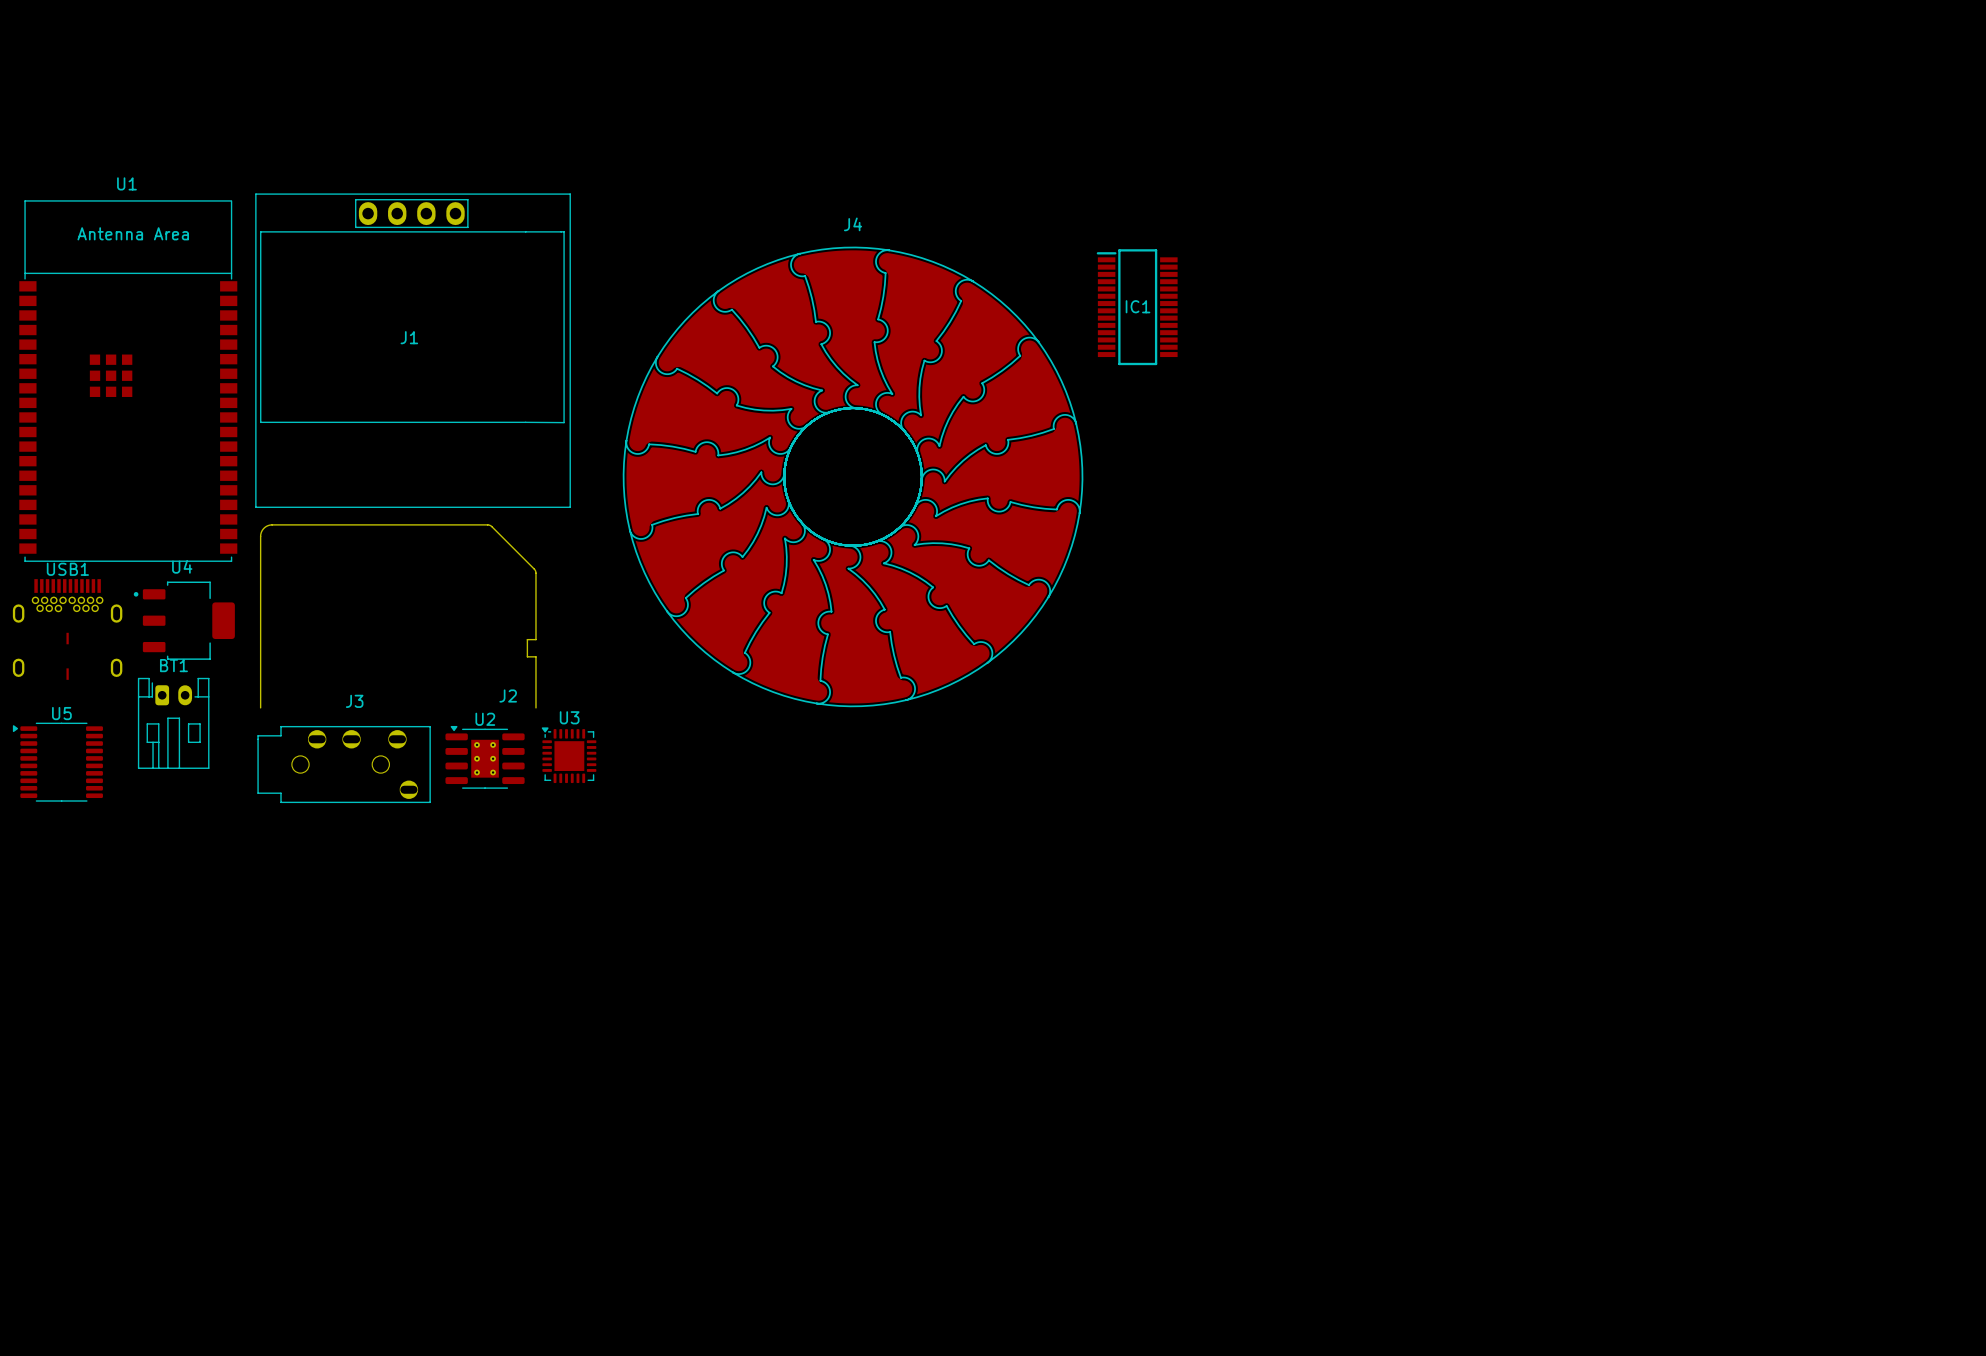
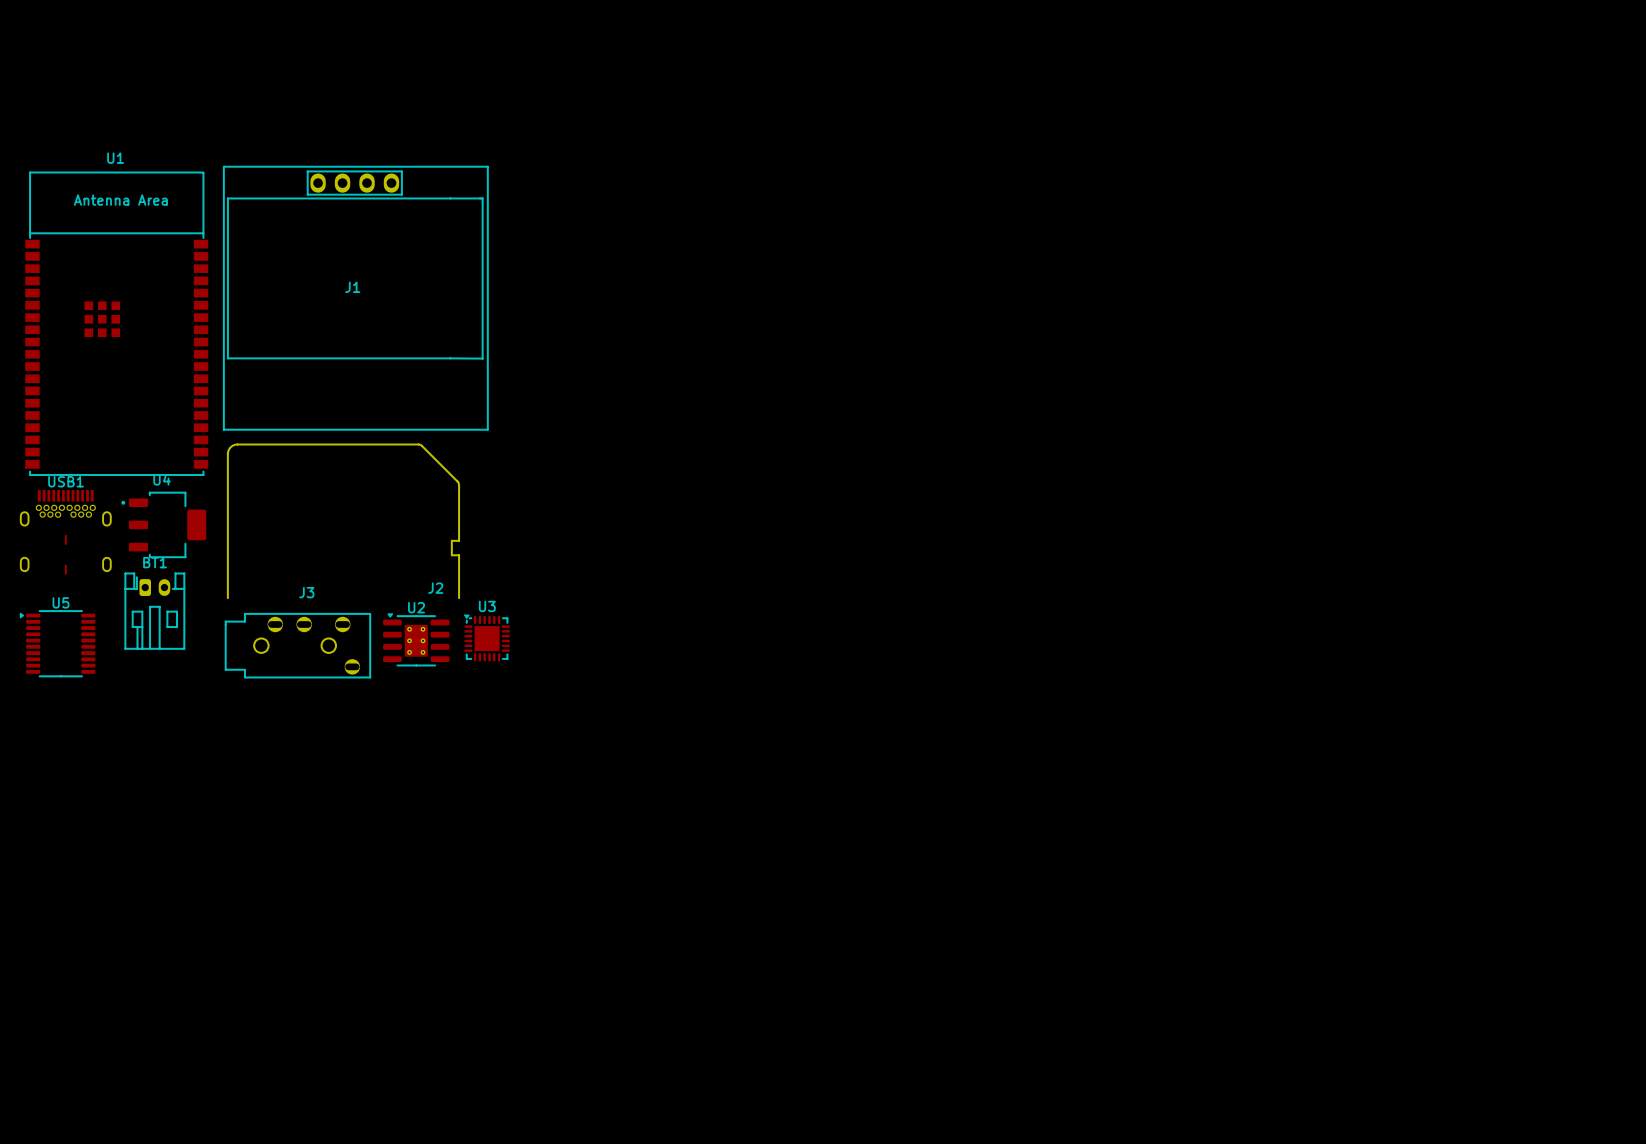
IC1: (1137, 307) -> none
J4: (853, 476) -> none

